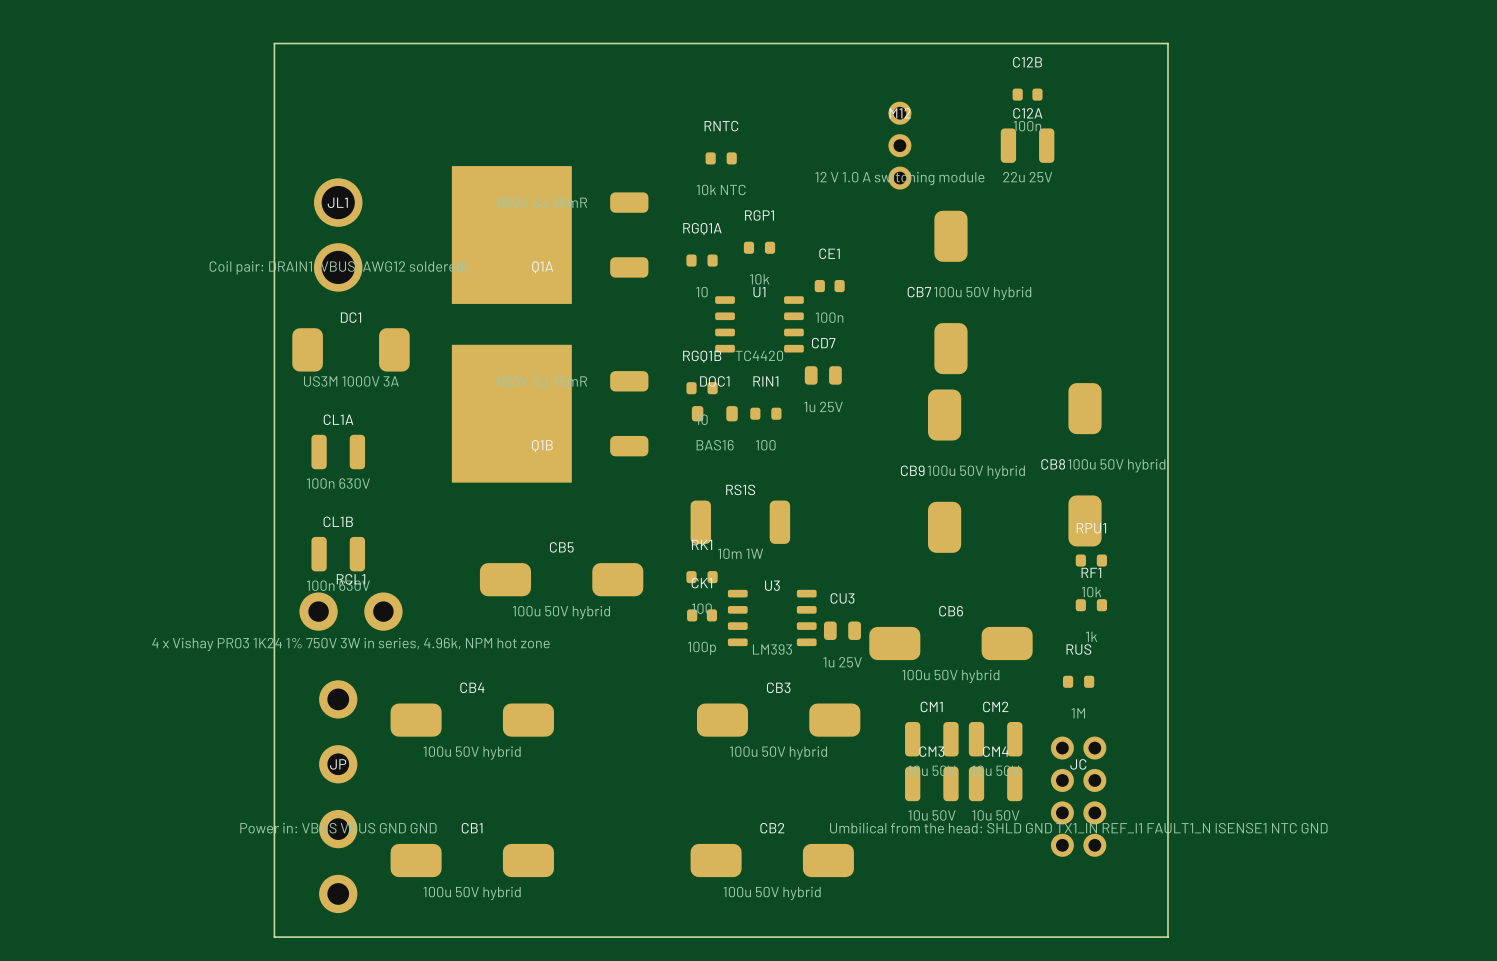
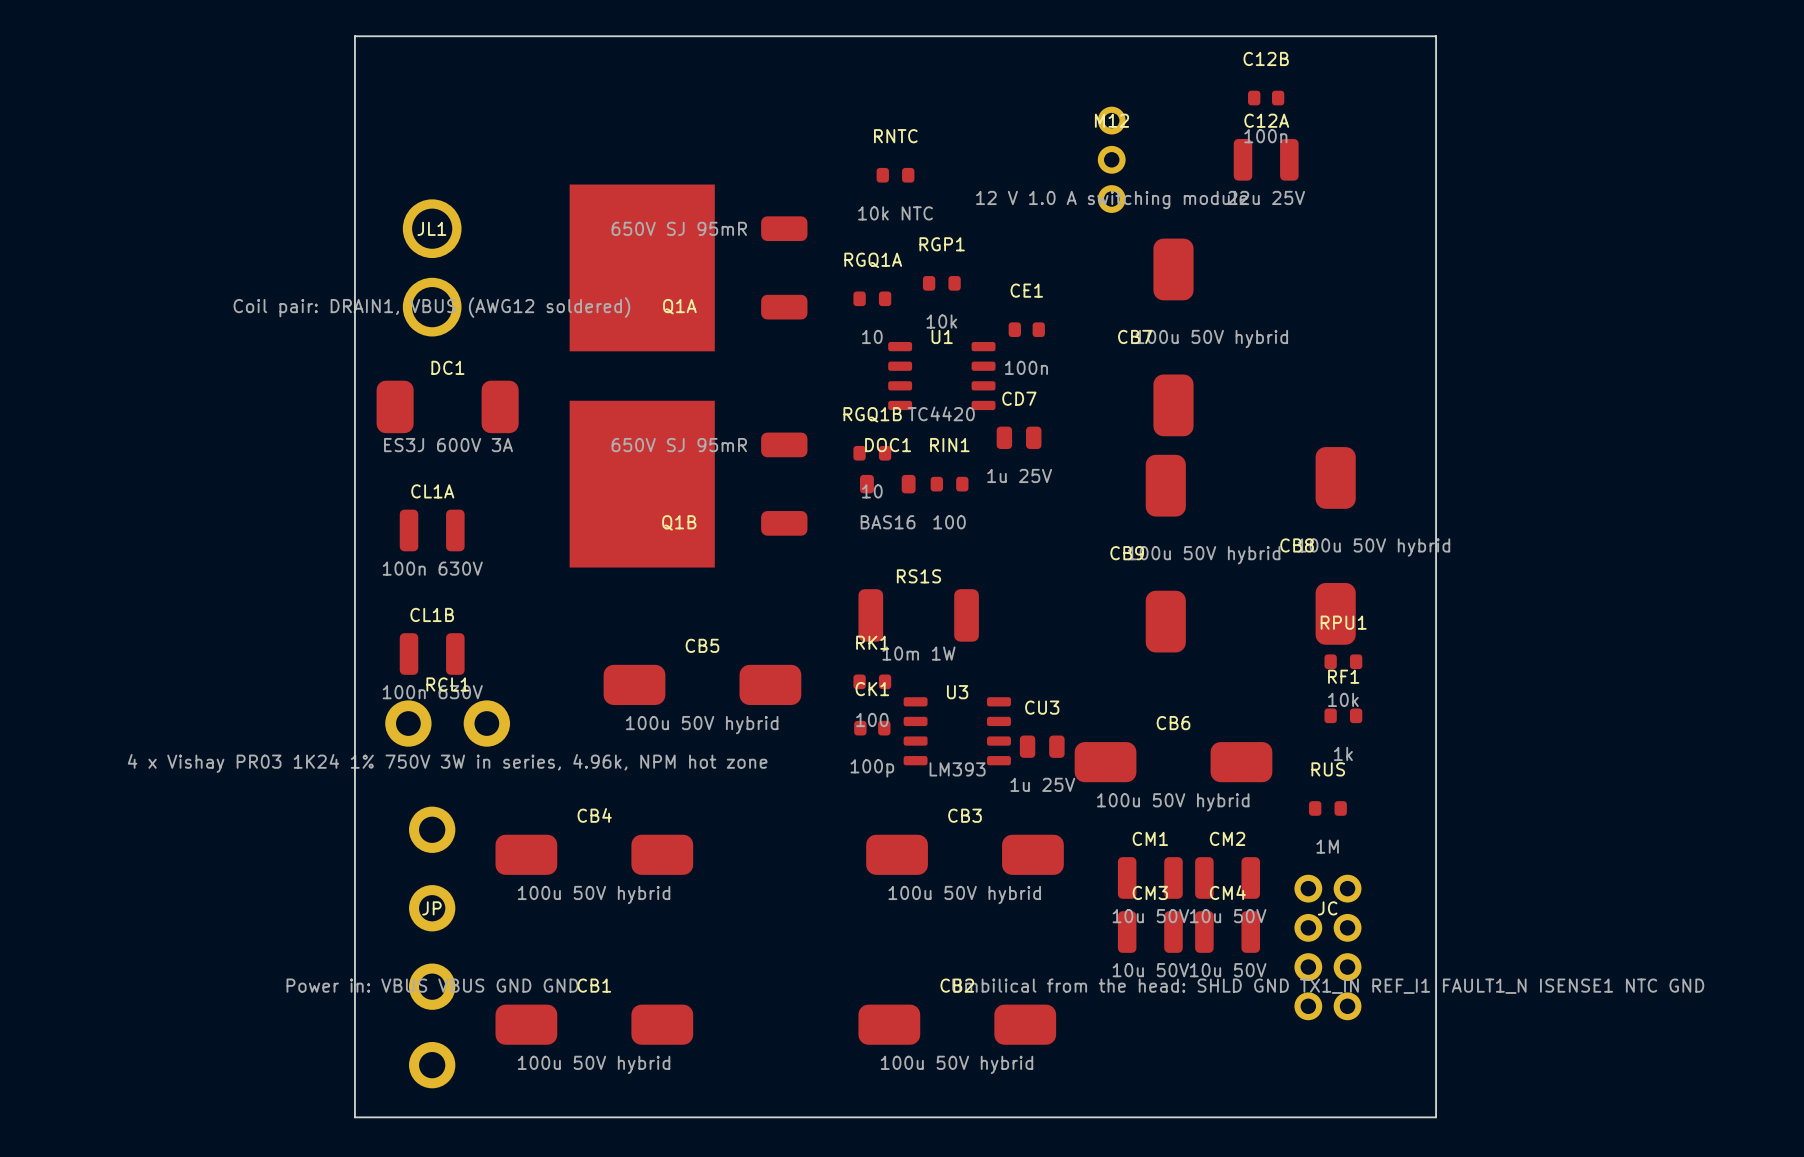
DC1 value: US3M 1000V 3A (351, 381) -> ES3J 600V 3A (448, 445)

